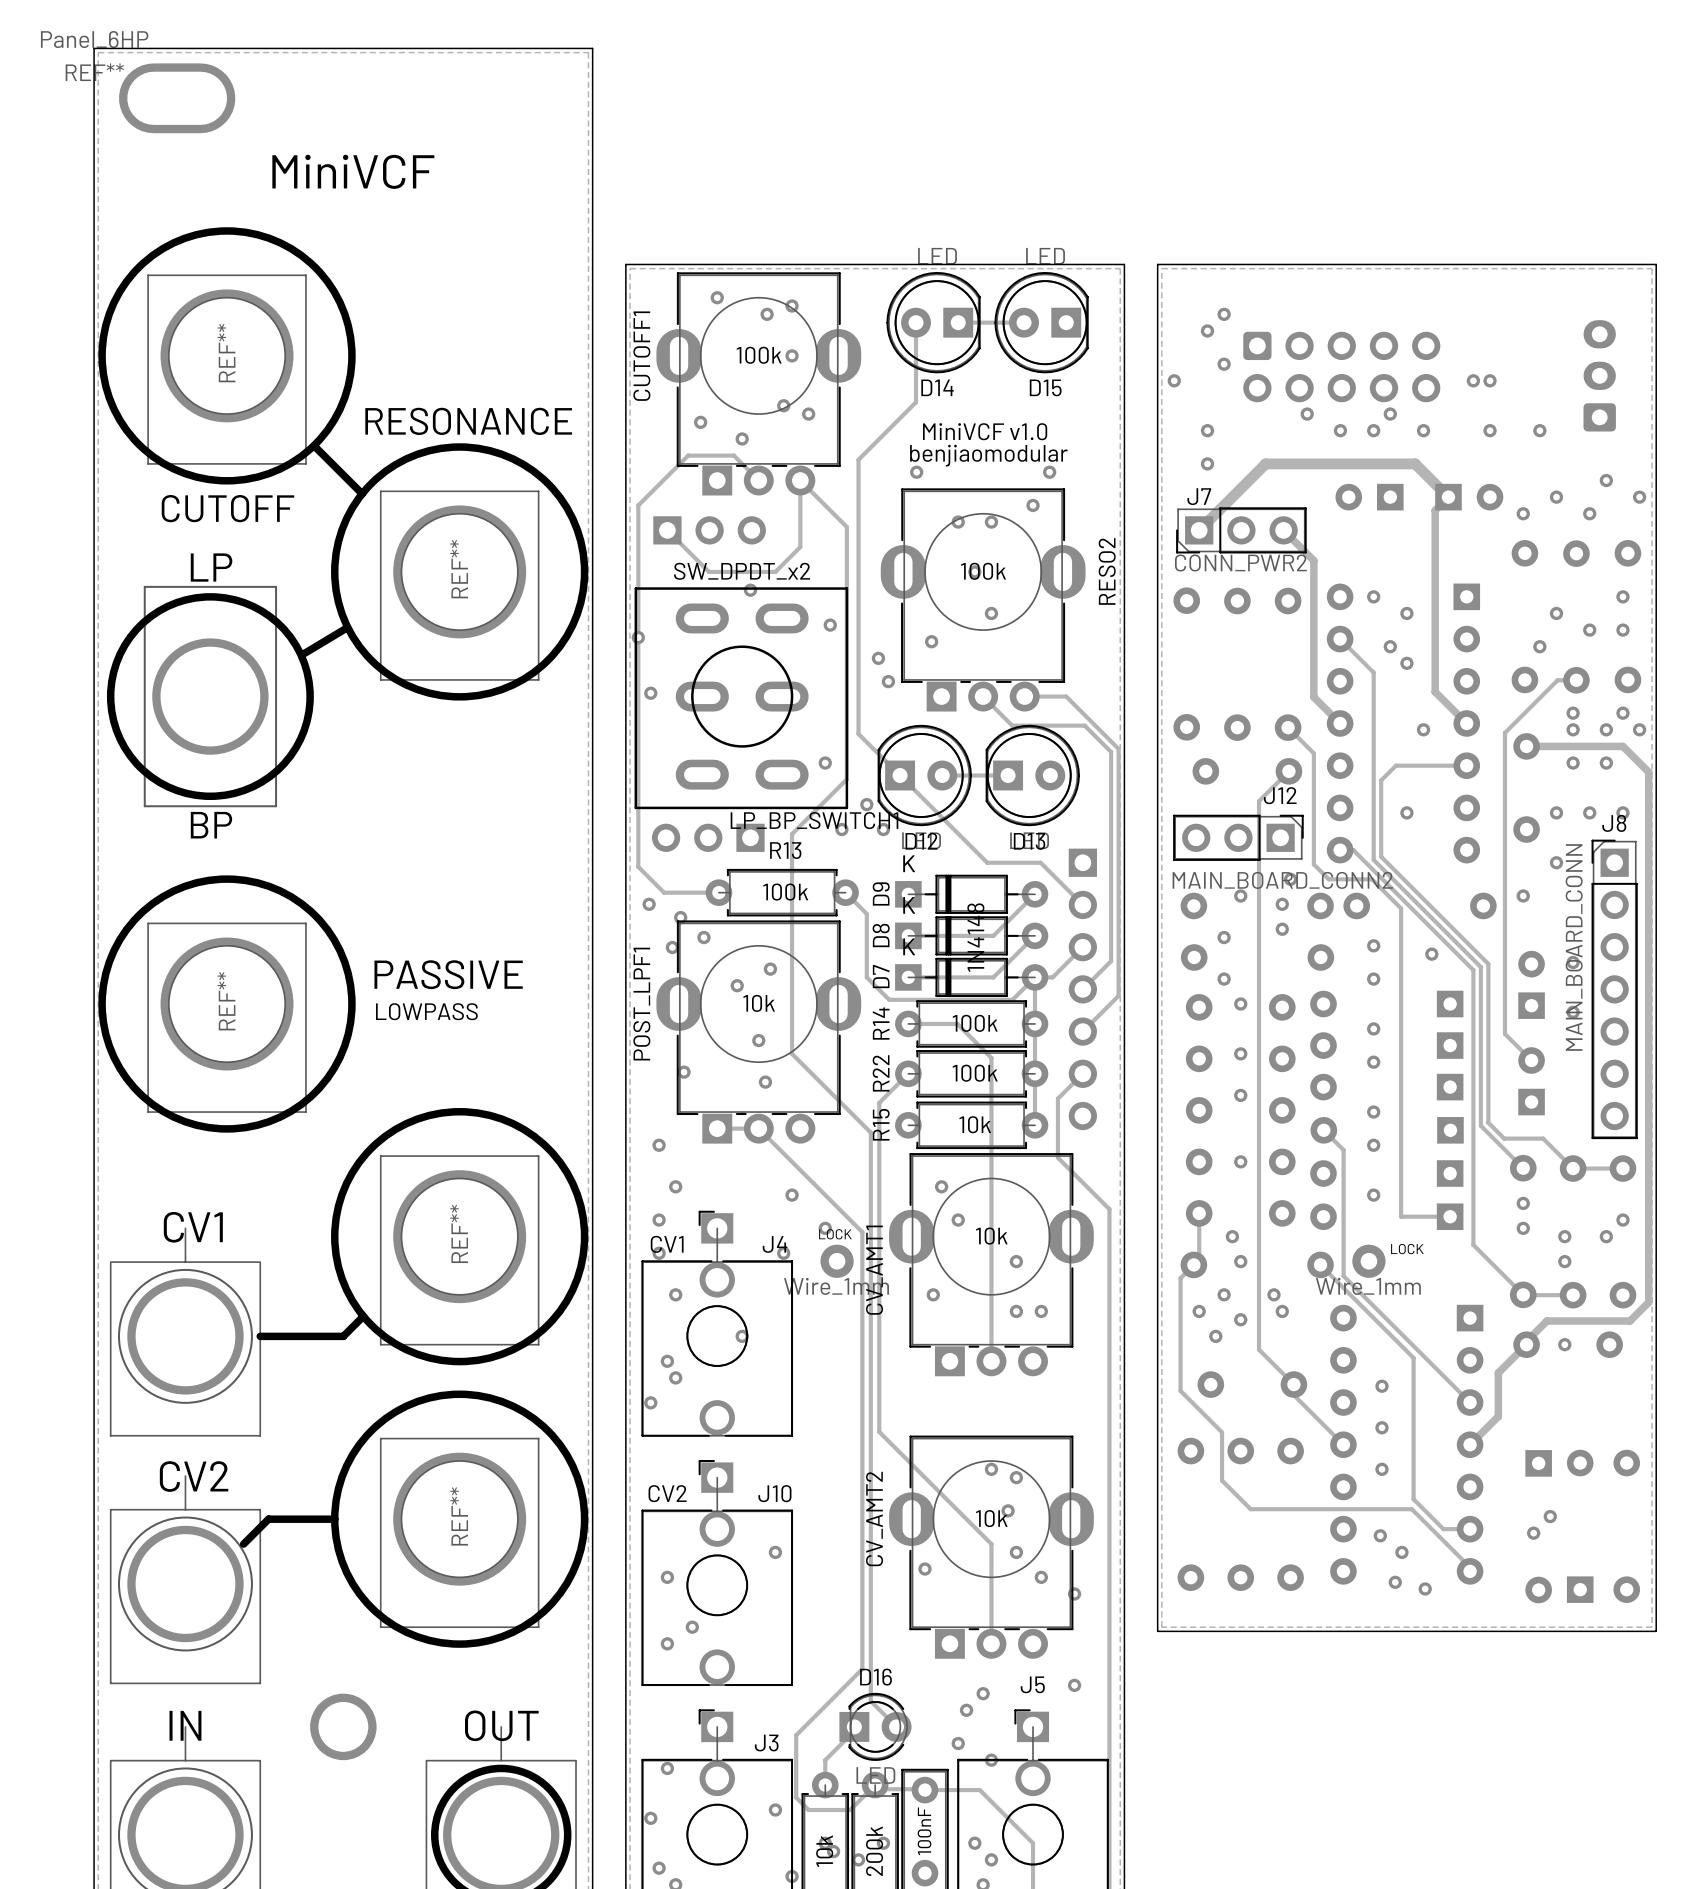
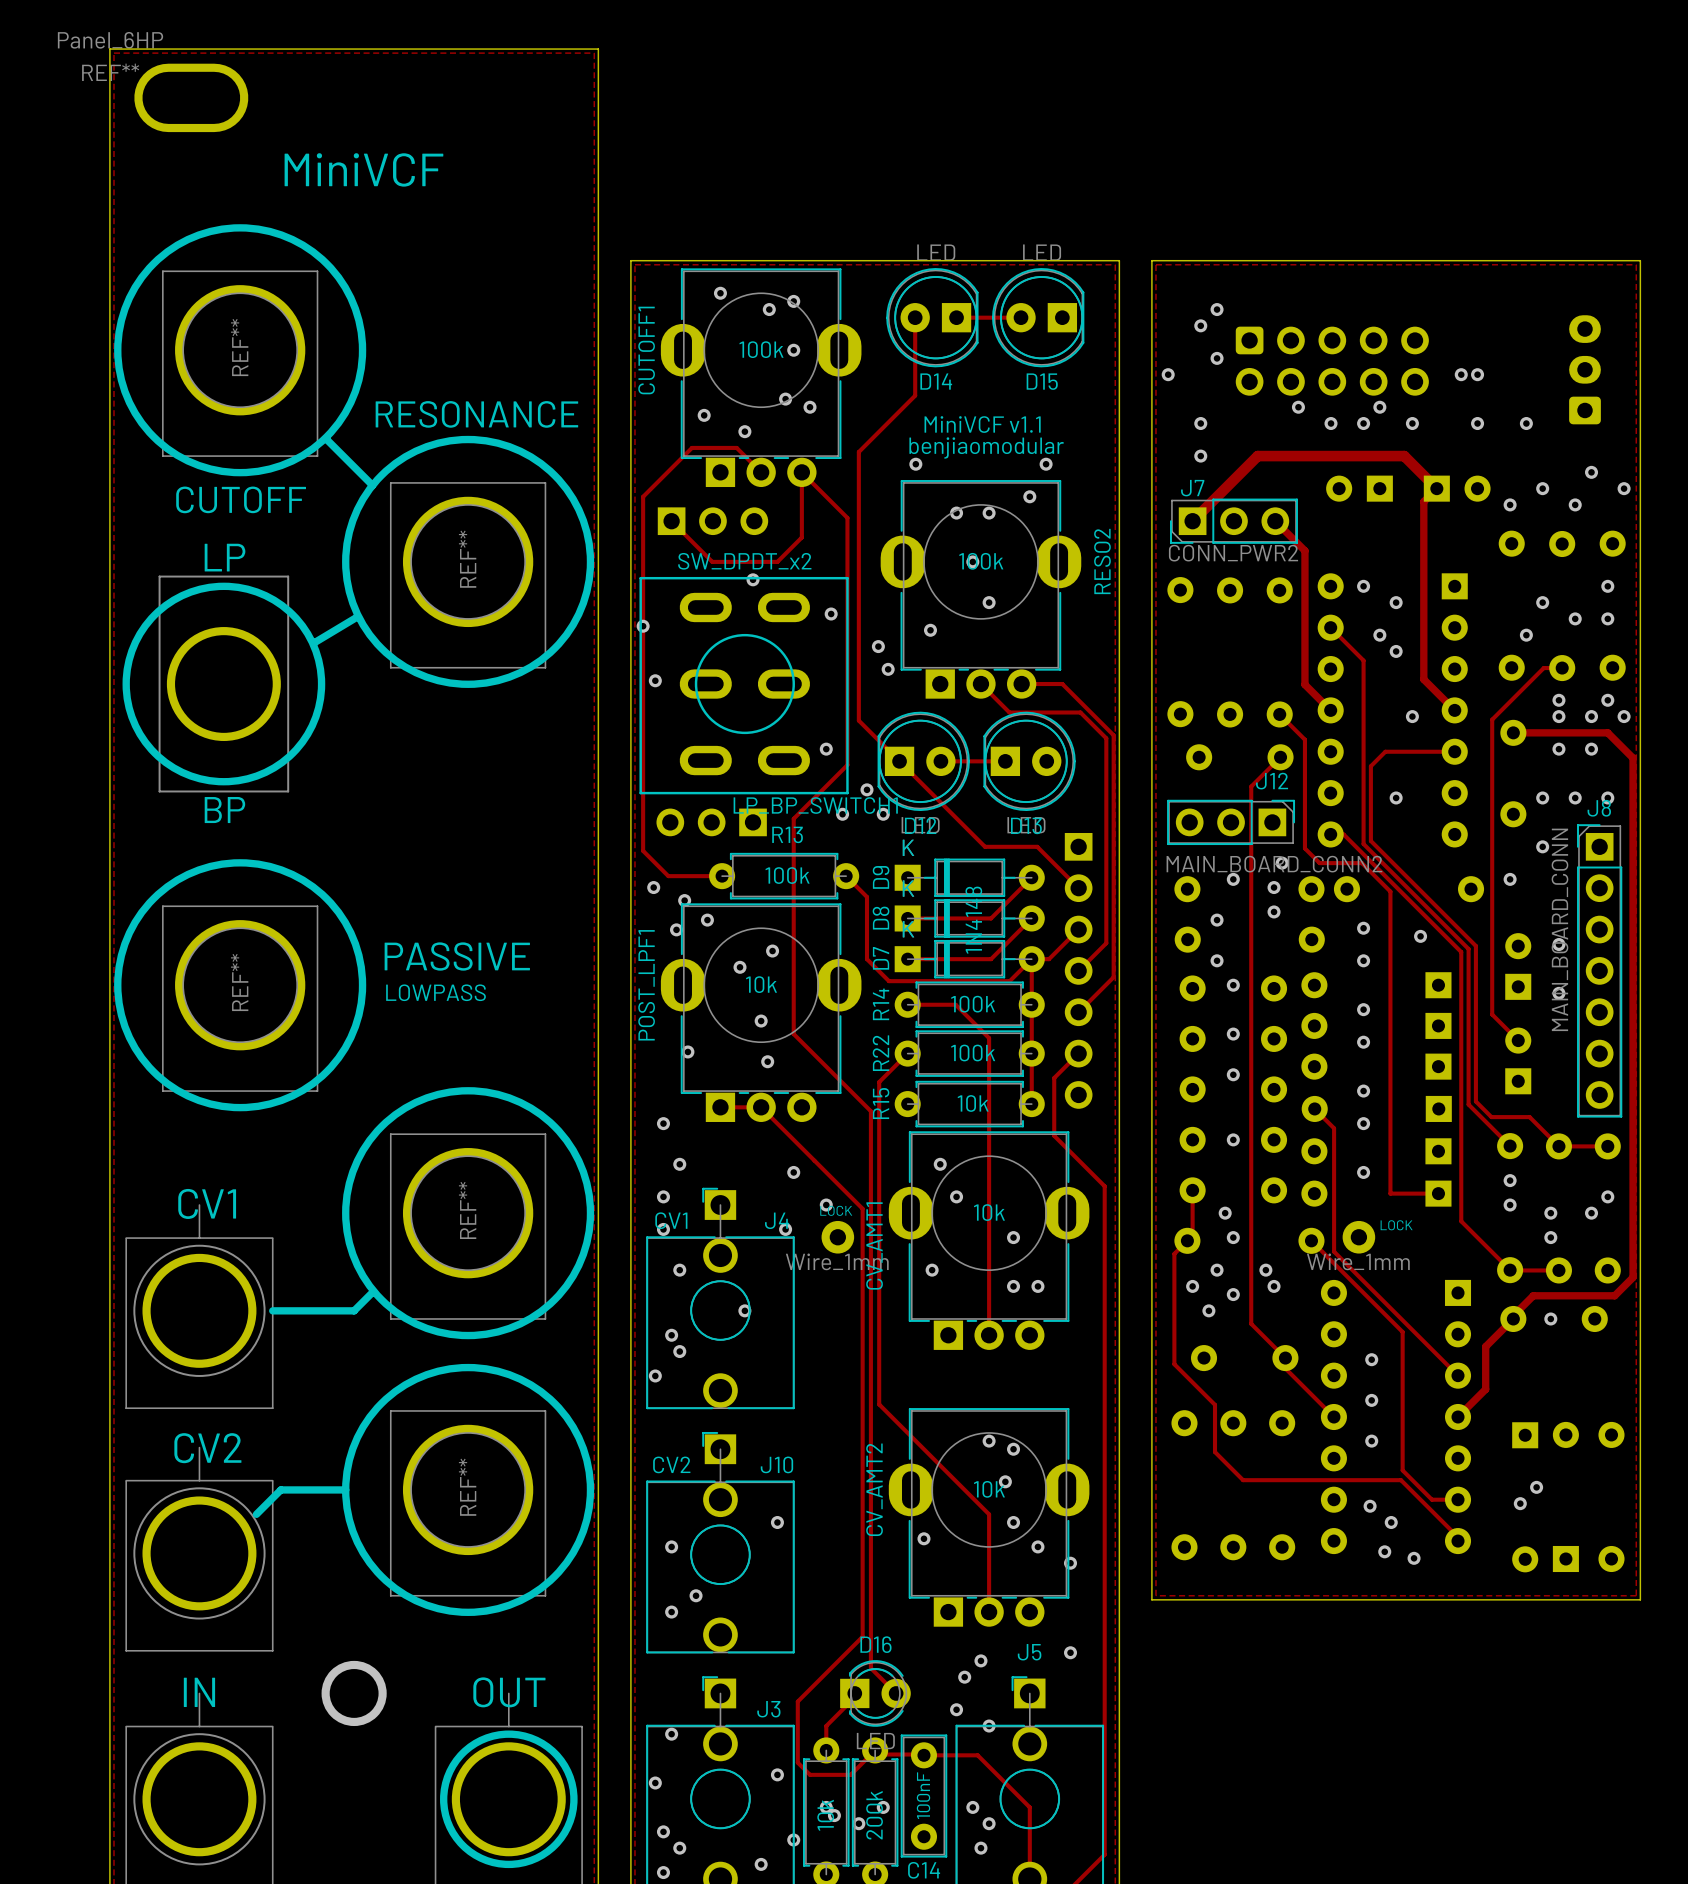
text: MiniVCF v1.0 (985, 431) -> MiniVCF v1.1 (982, 424)

